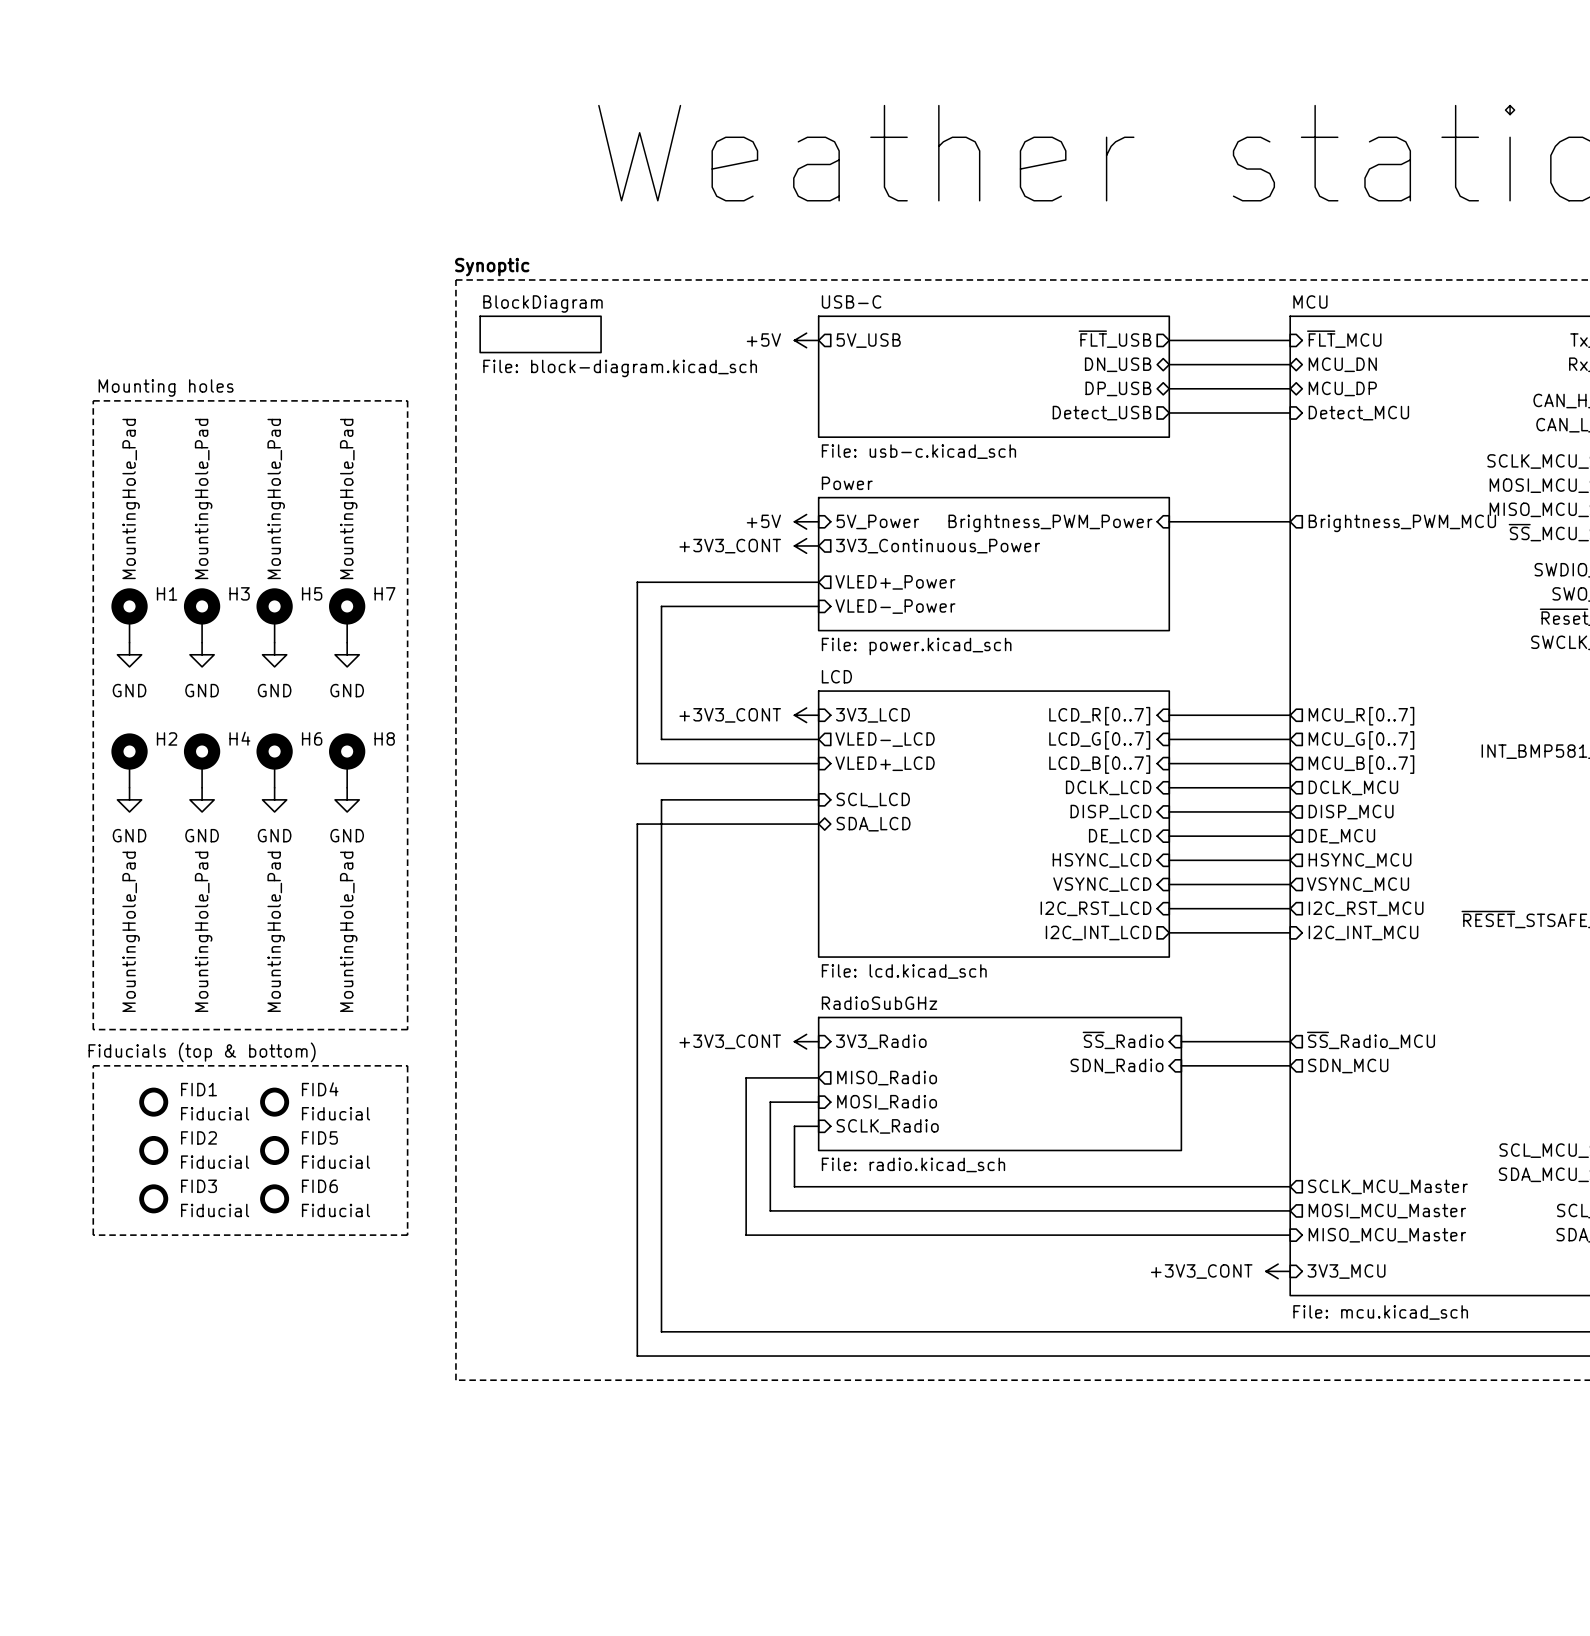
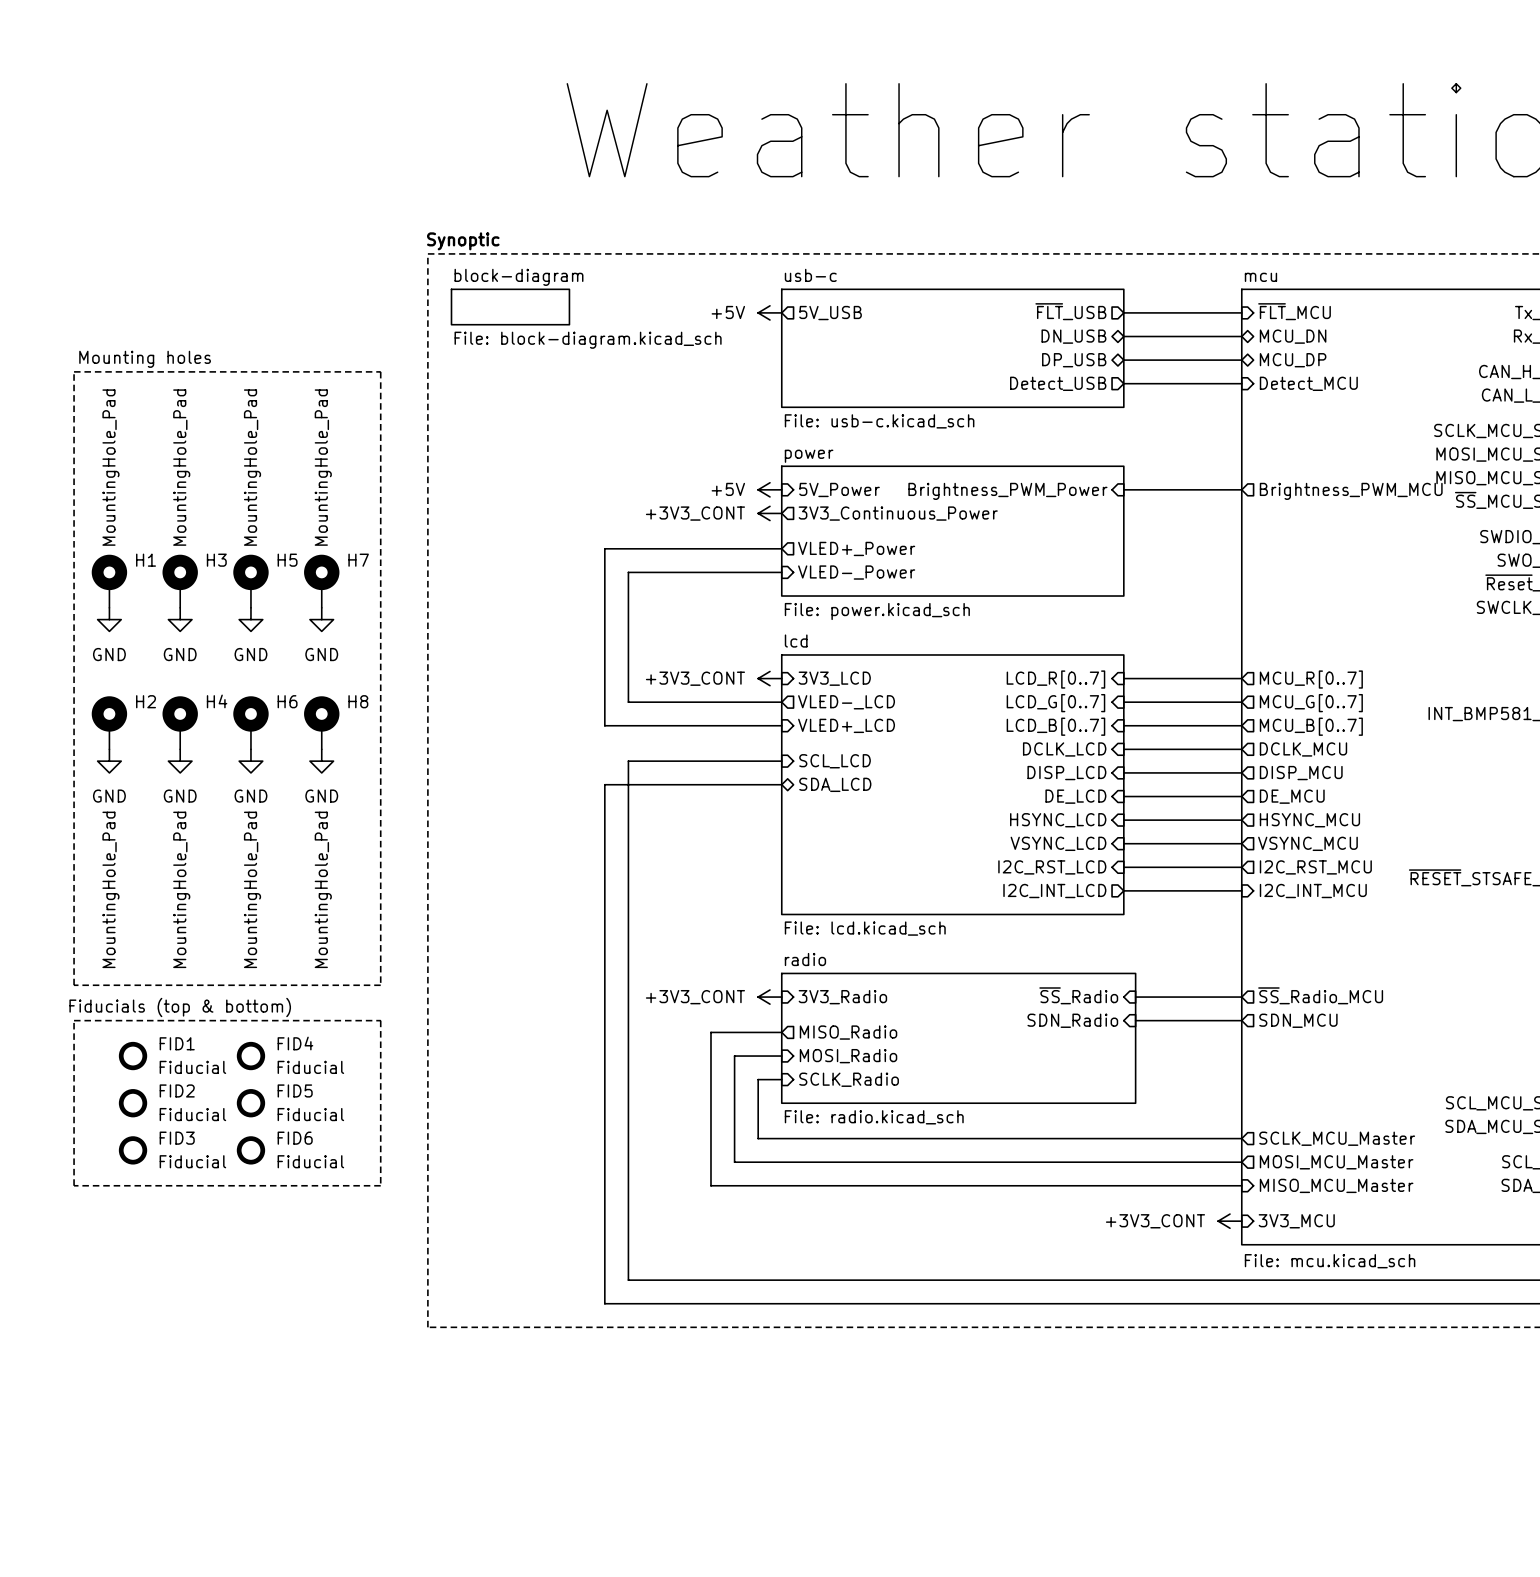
sheet USB-C name: USB-C (851, 301) -> usb-c (810, 275)
sheet MCU name: MCU (1310, 301) -> mcu (1260, 277)
sheet BlockDiagram name: BlockDiagram (542, 303) -> block-diagram (518, 277)
sheet Power name: Power (847, 483) -> power (809, 456)
sheet LCD name: LCD (836, 676) -> lcd (796, 641)
sheet RadioSubGHz name: RadioSubGHz (879, 1003) -> radio (805, 959)

